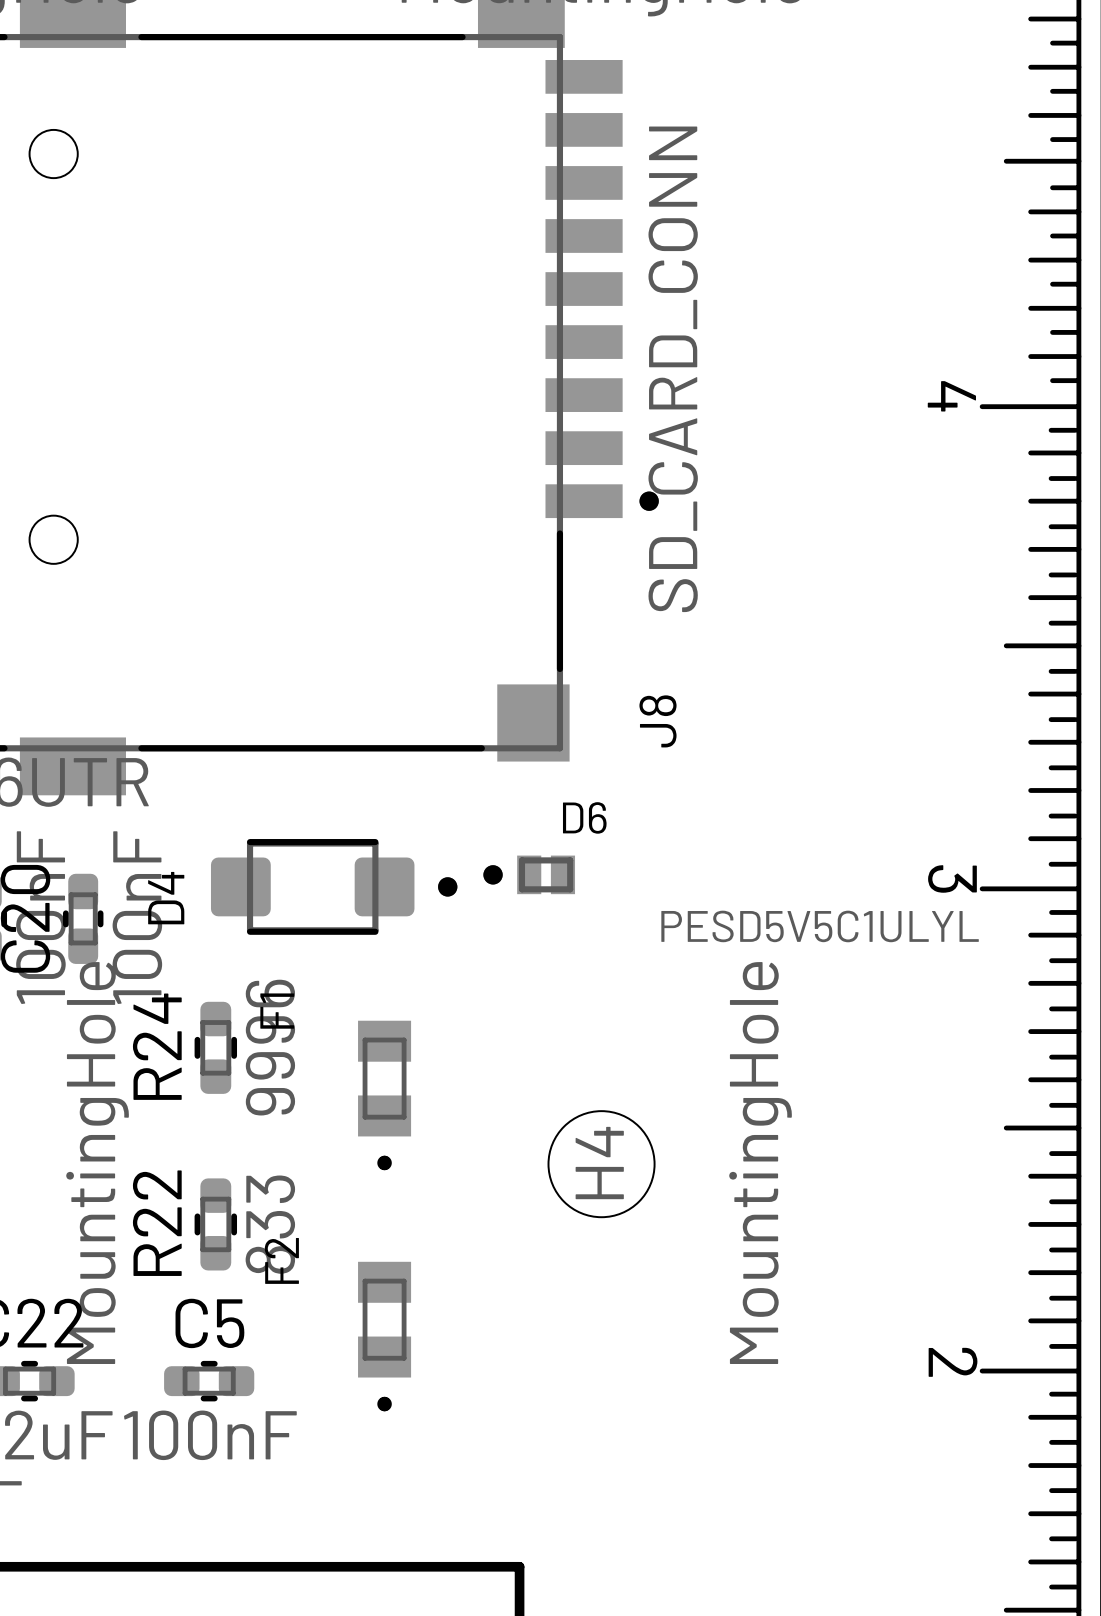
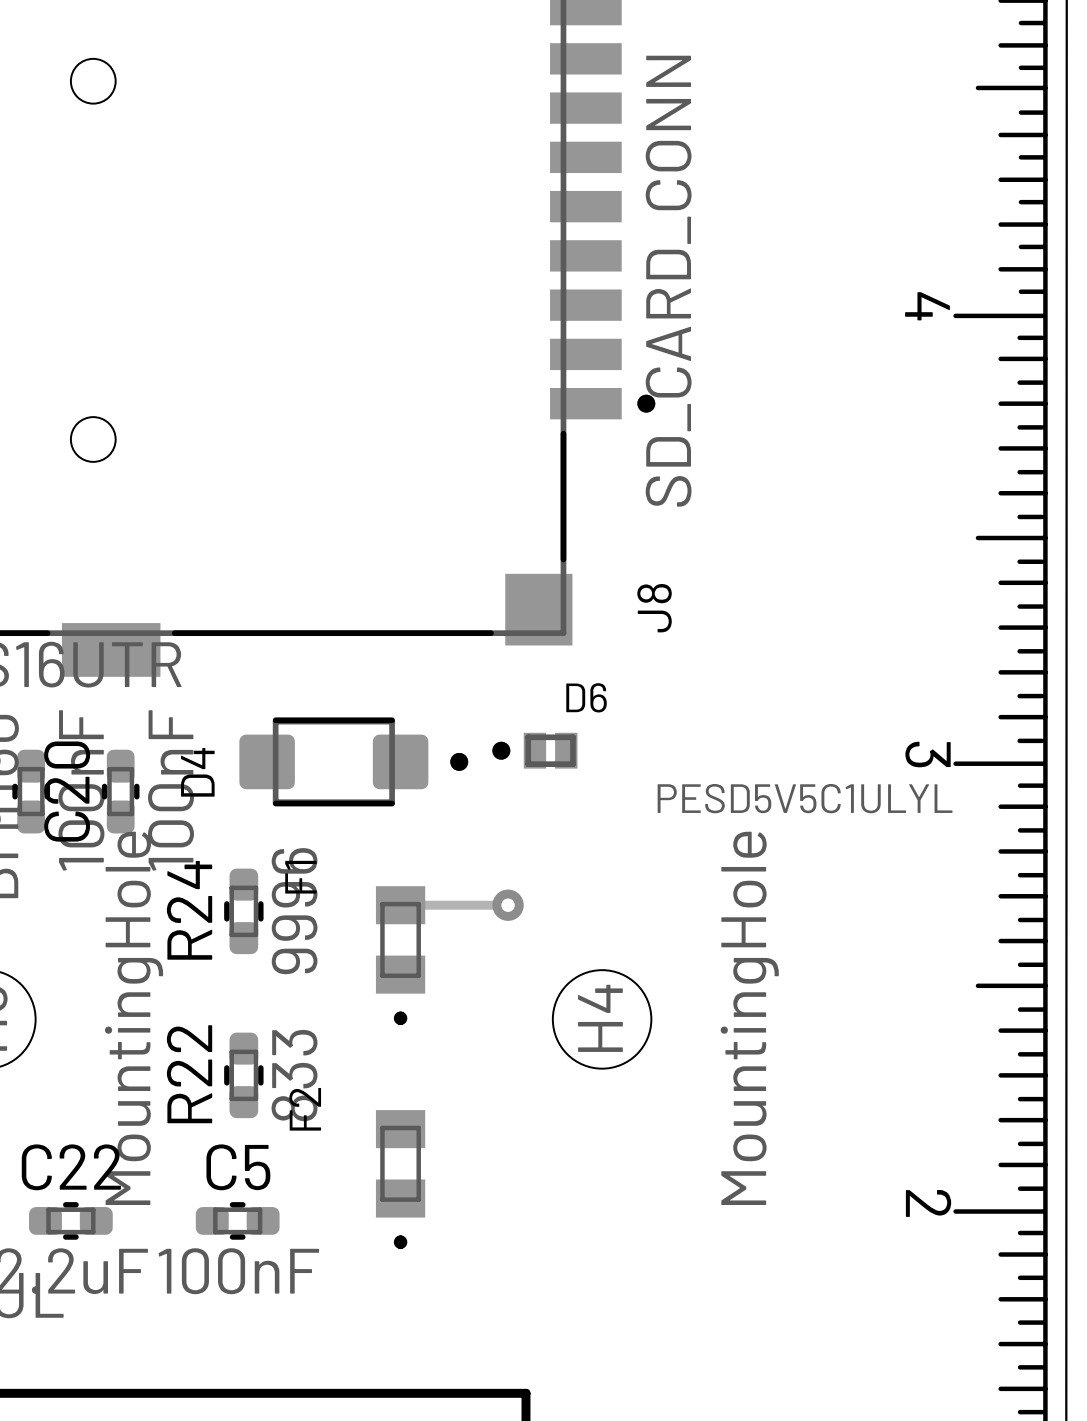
track: none -> (400, 905) (508, 905)
via: none -> (508, 905)

